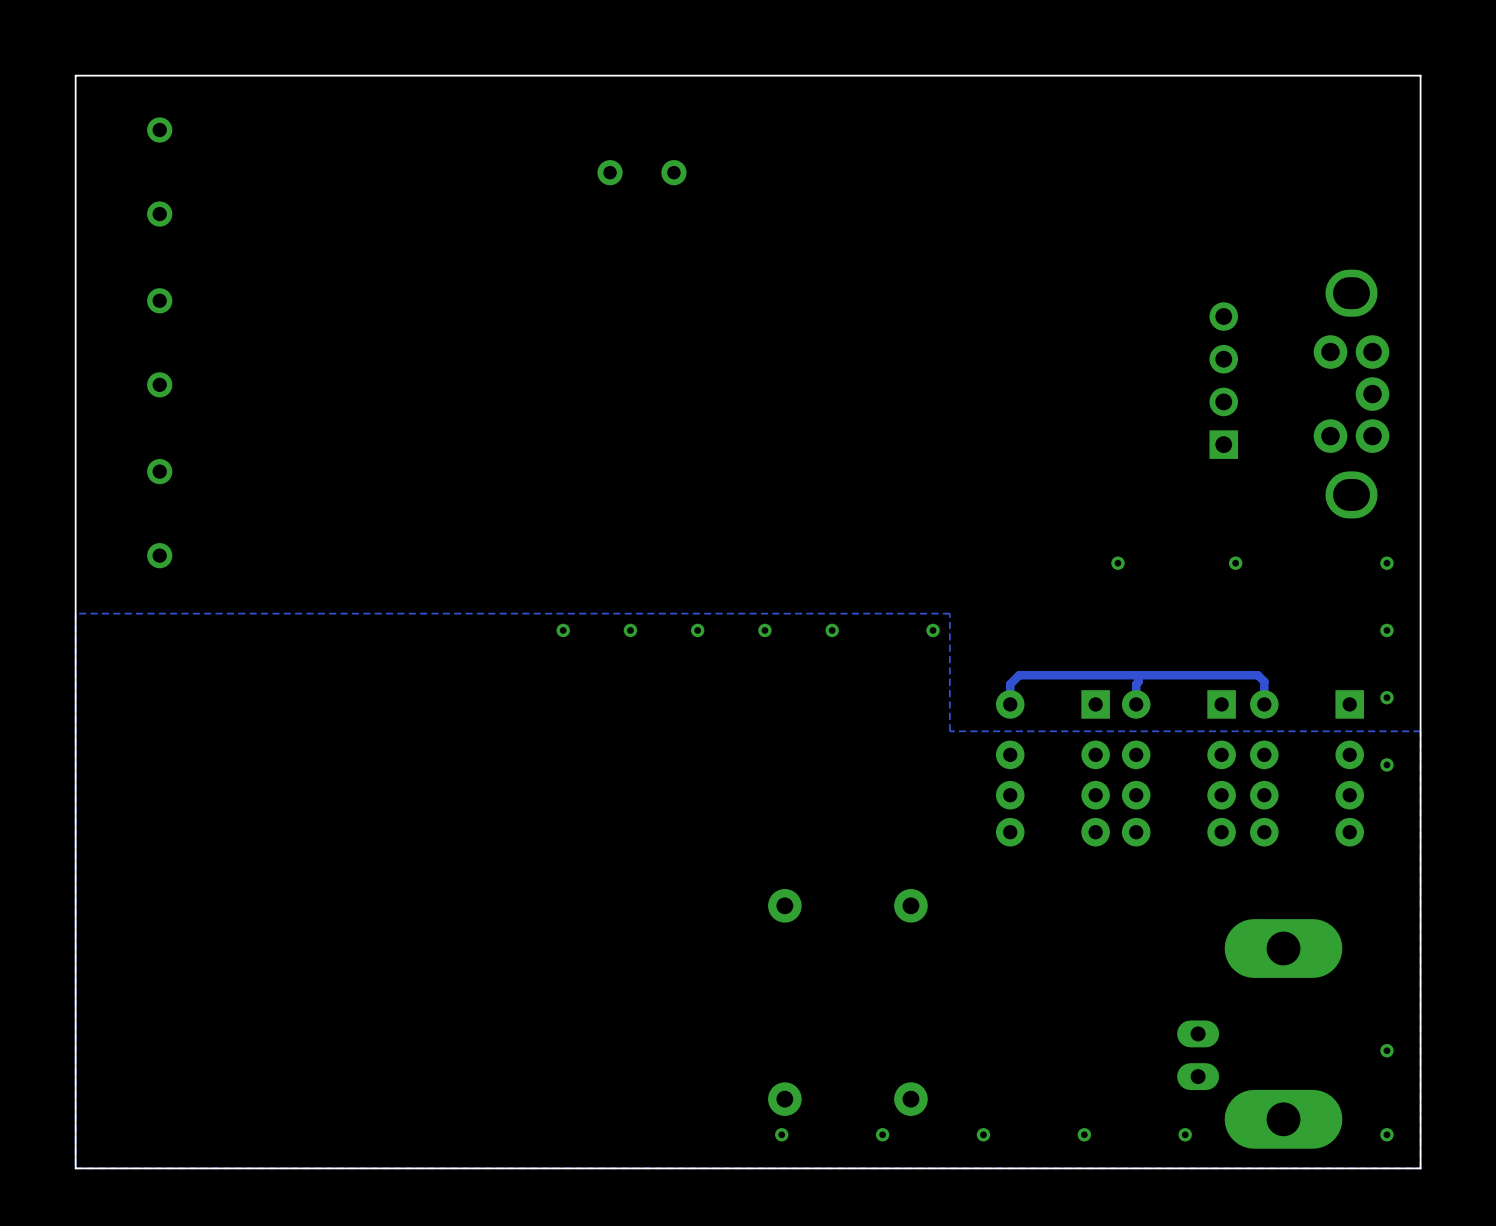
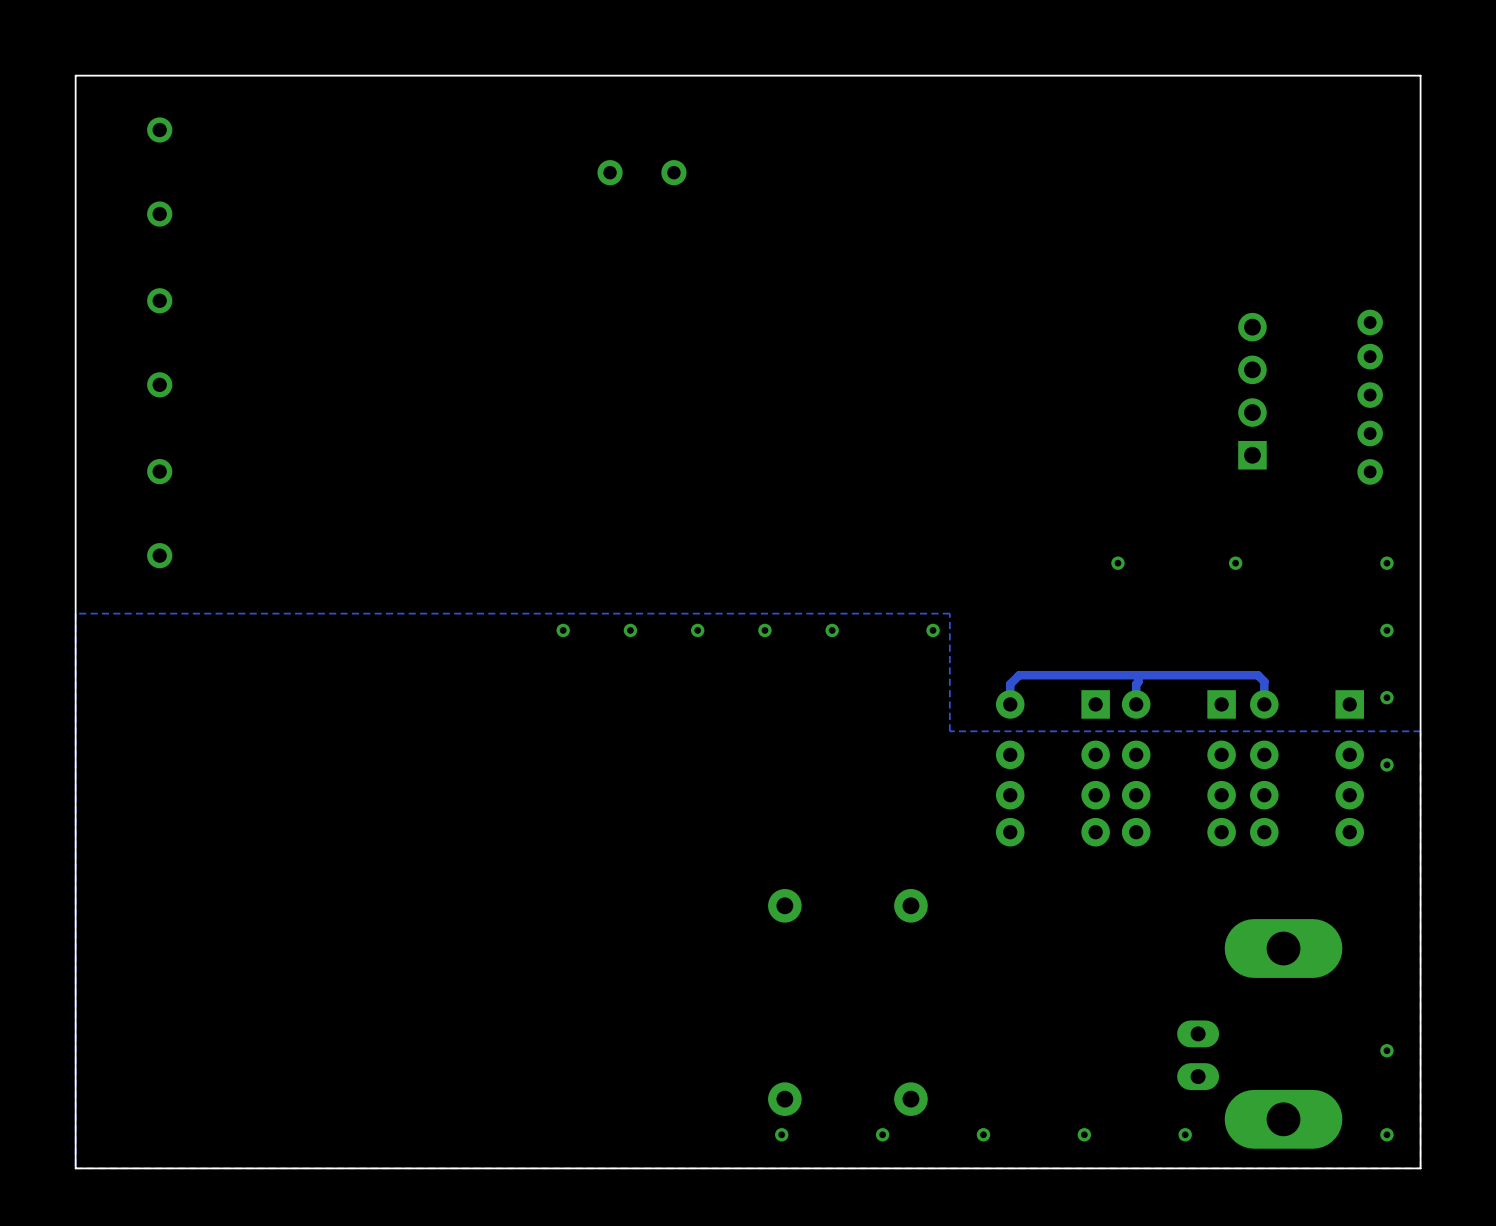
part position: (1223, 380) -> (1252, 391)
part: (1351, 394) -> none
part: none -> (1370, 397)

